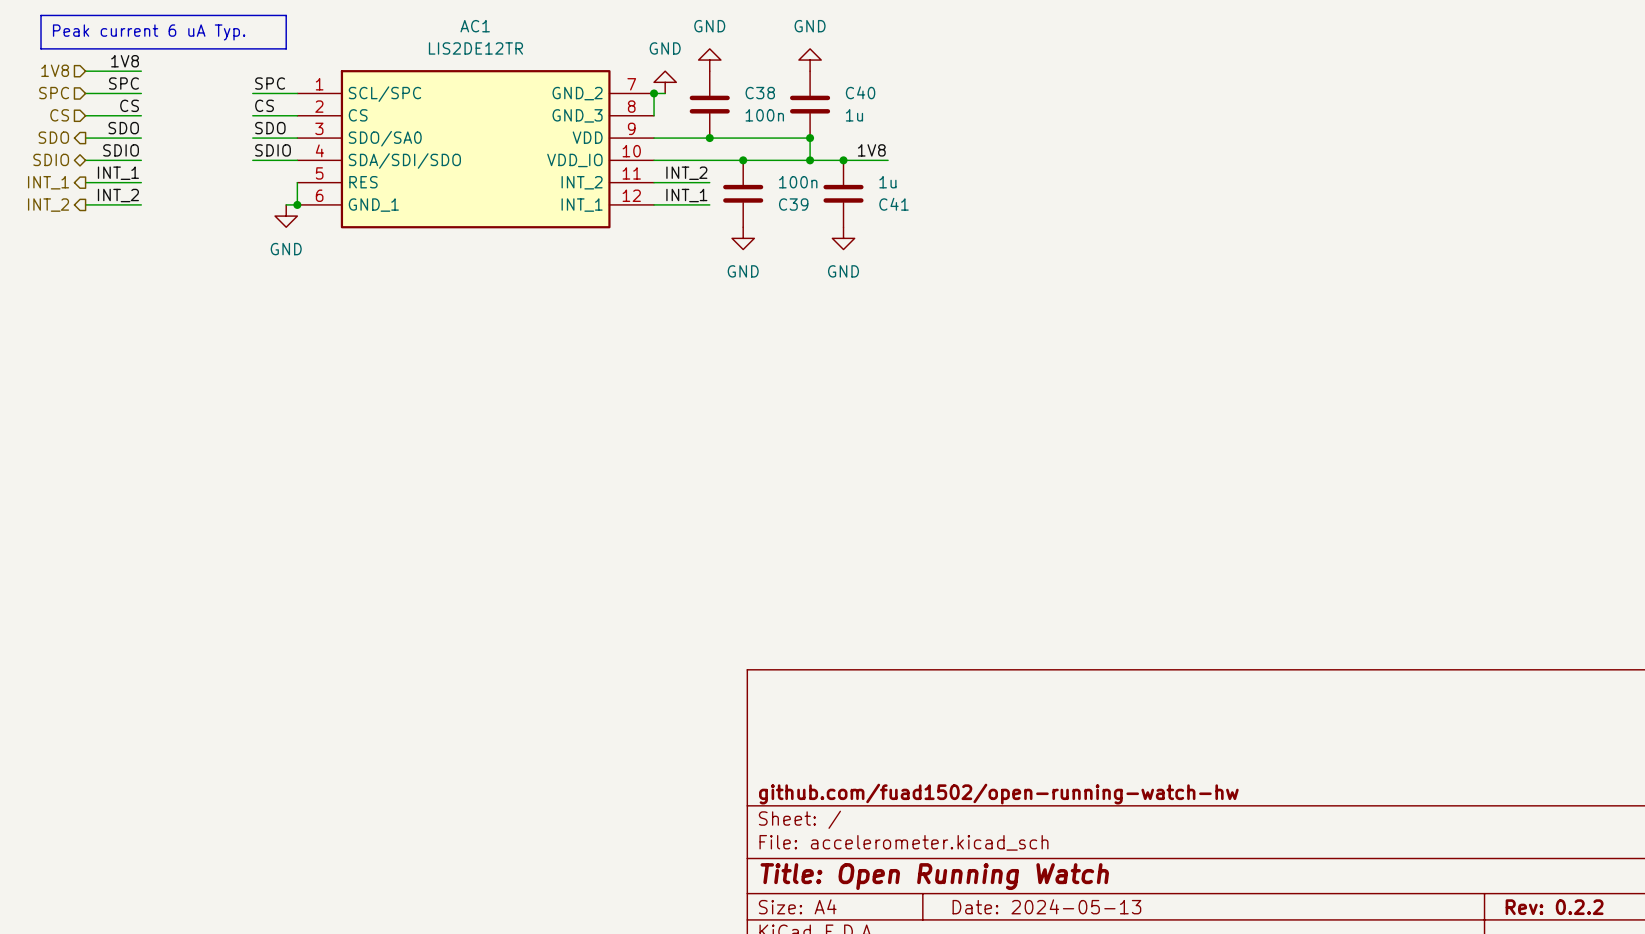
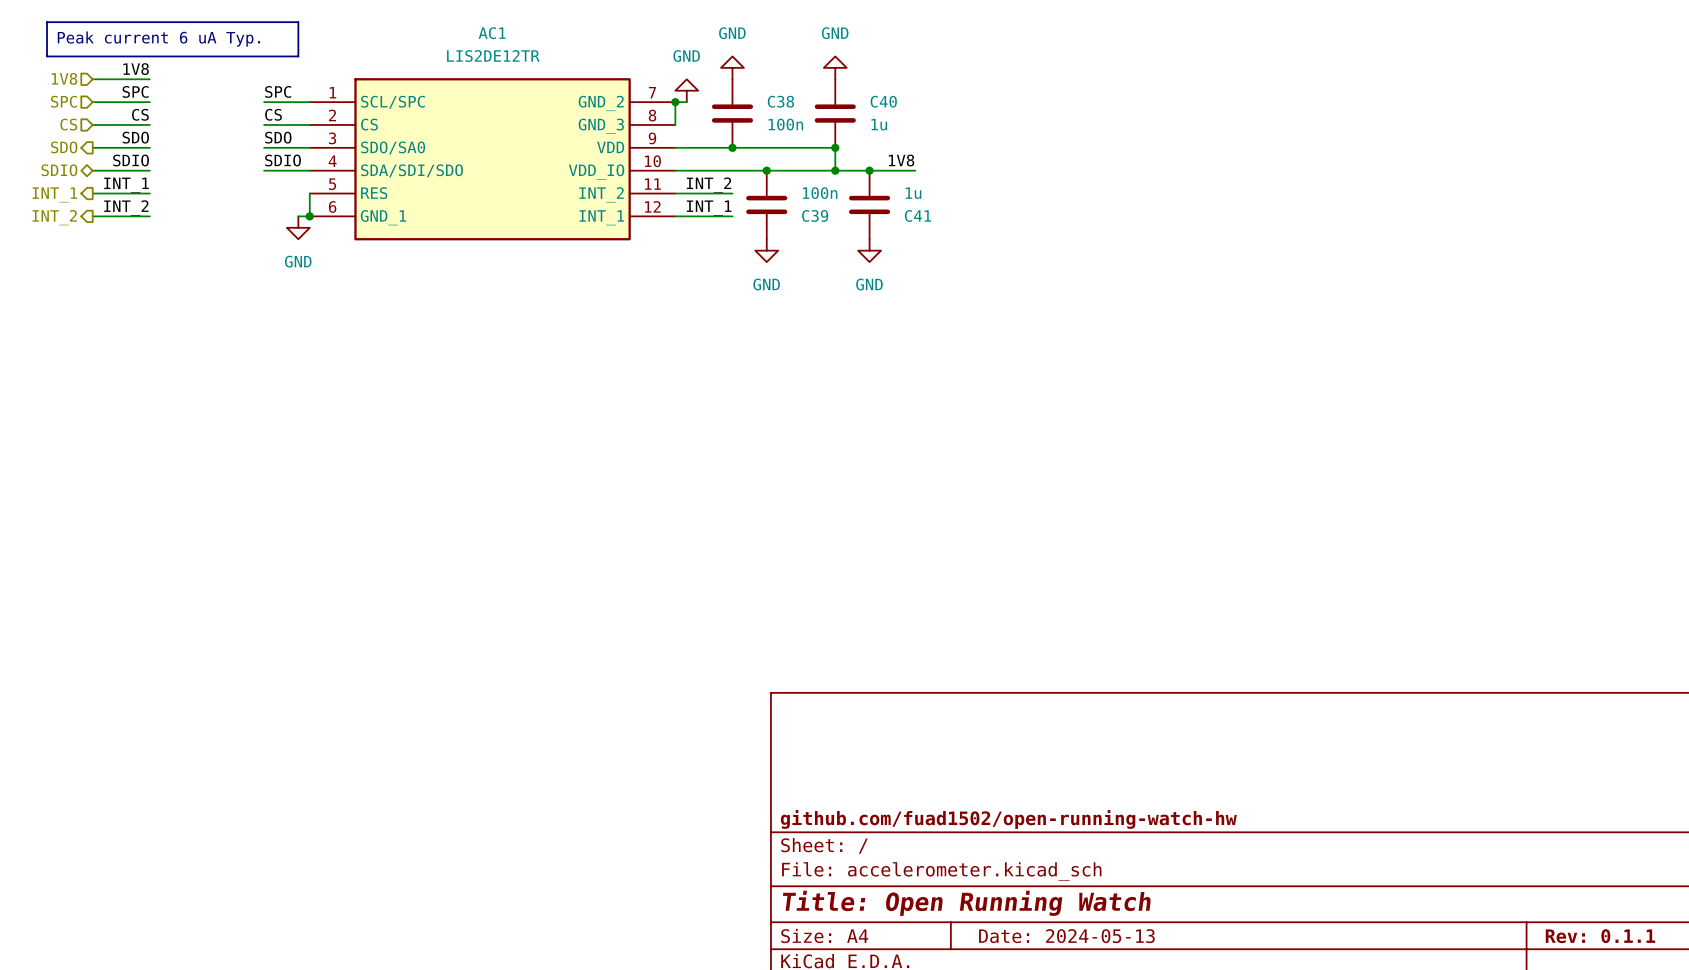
title block: Rev: 0.2.2 (1554, 907) -> Rev: 0.1.1 (1600, 936)

